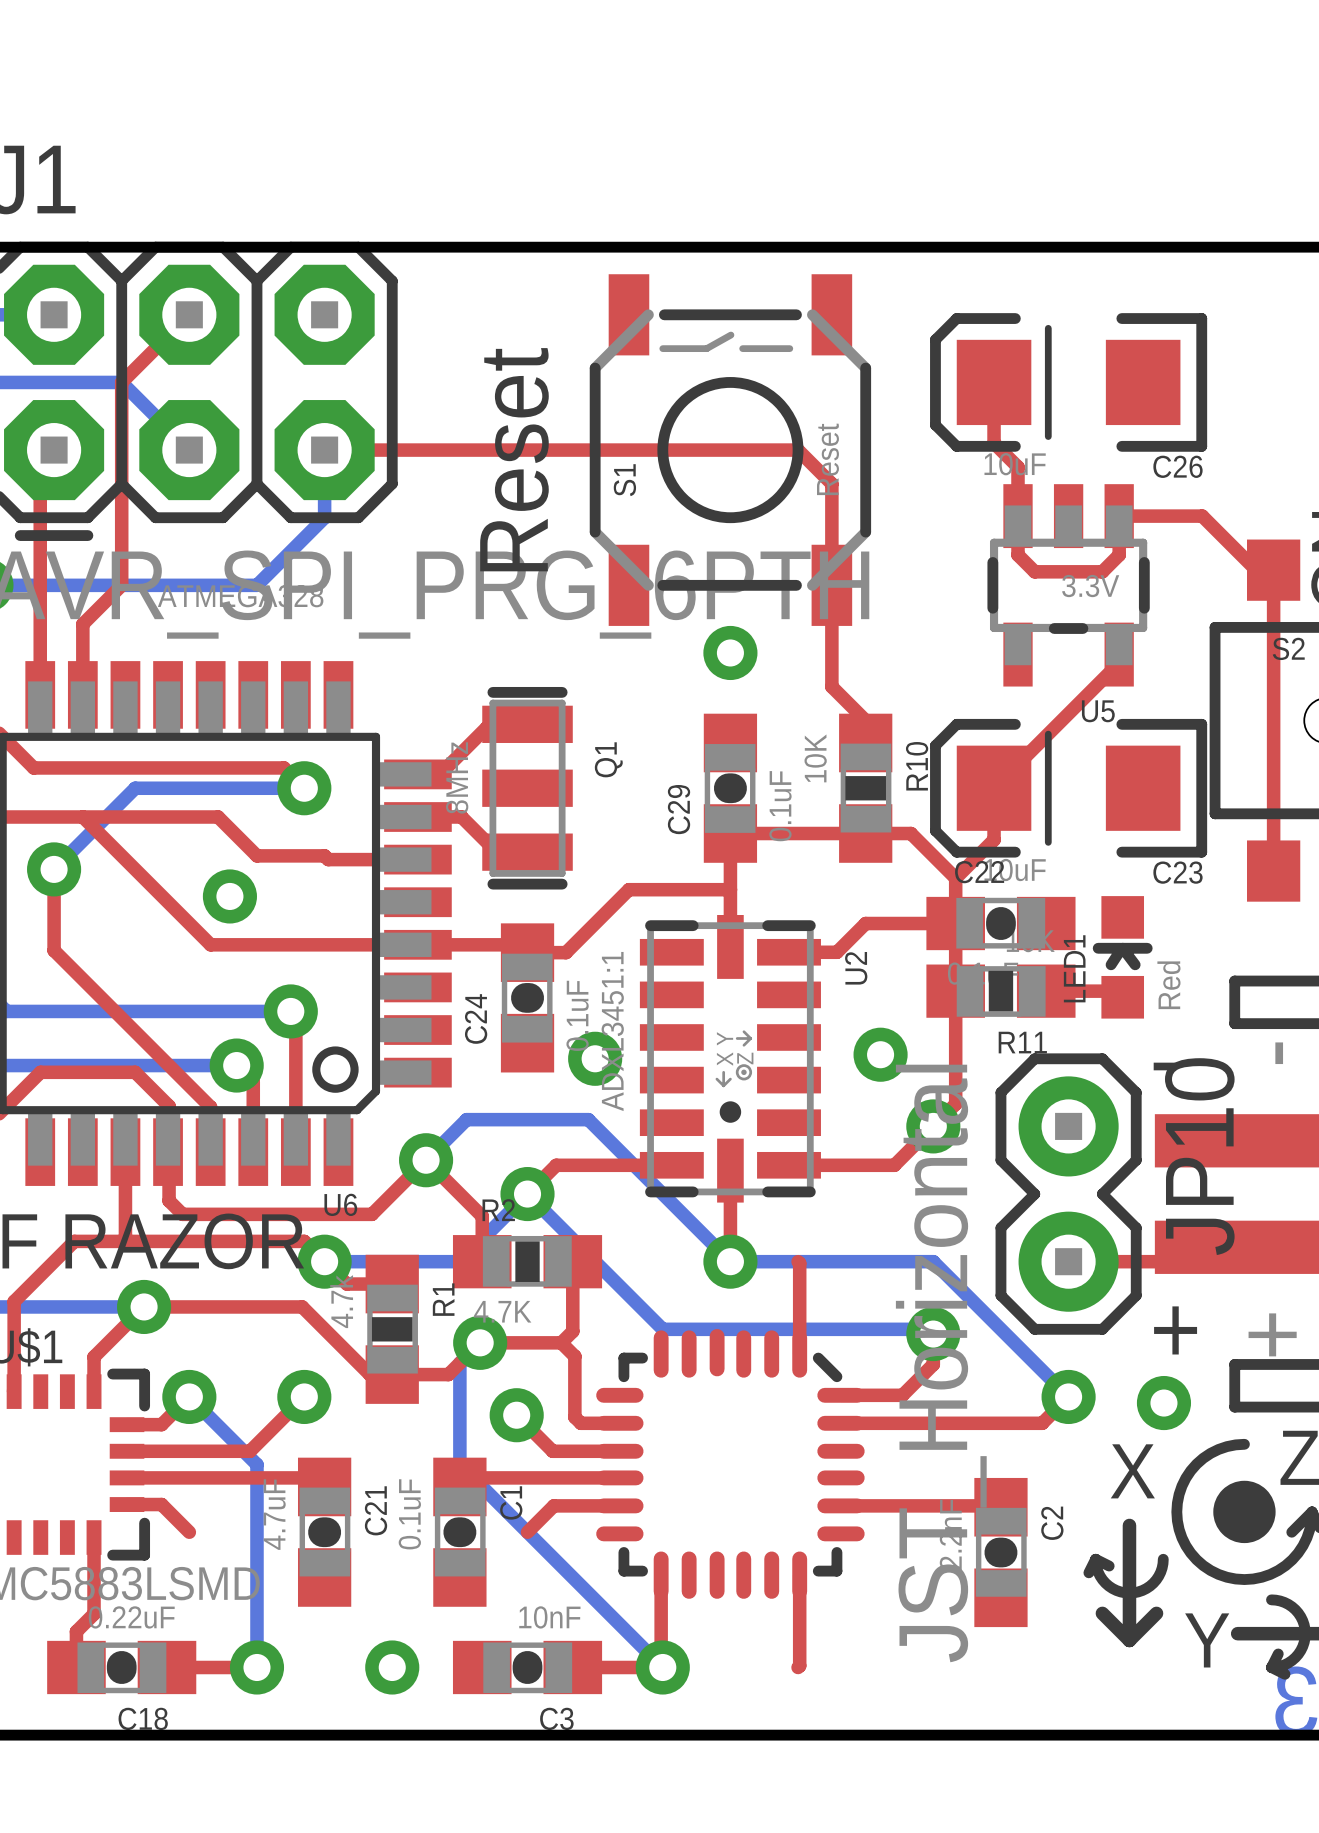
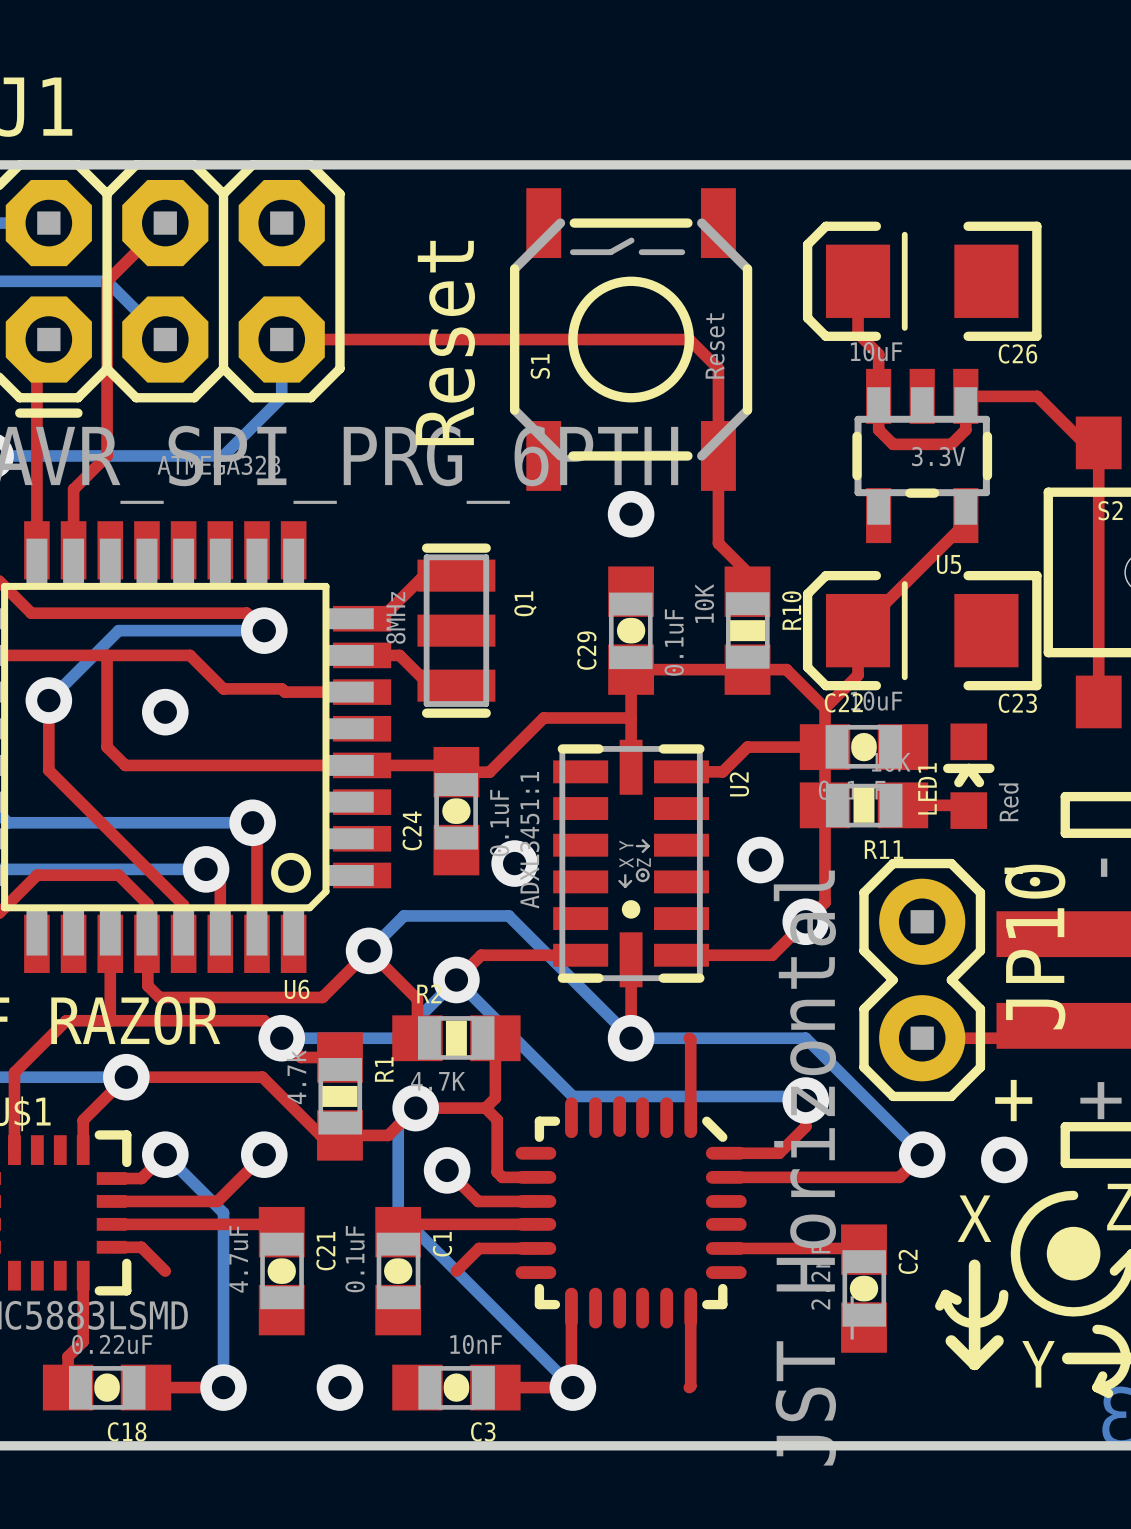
top track: (82, 817) (210, 944) -> (107, 655) (107, 747) (125, 765) (183, 765)
via position: (229, 896) -> (165, 712)

